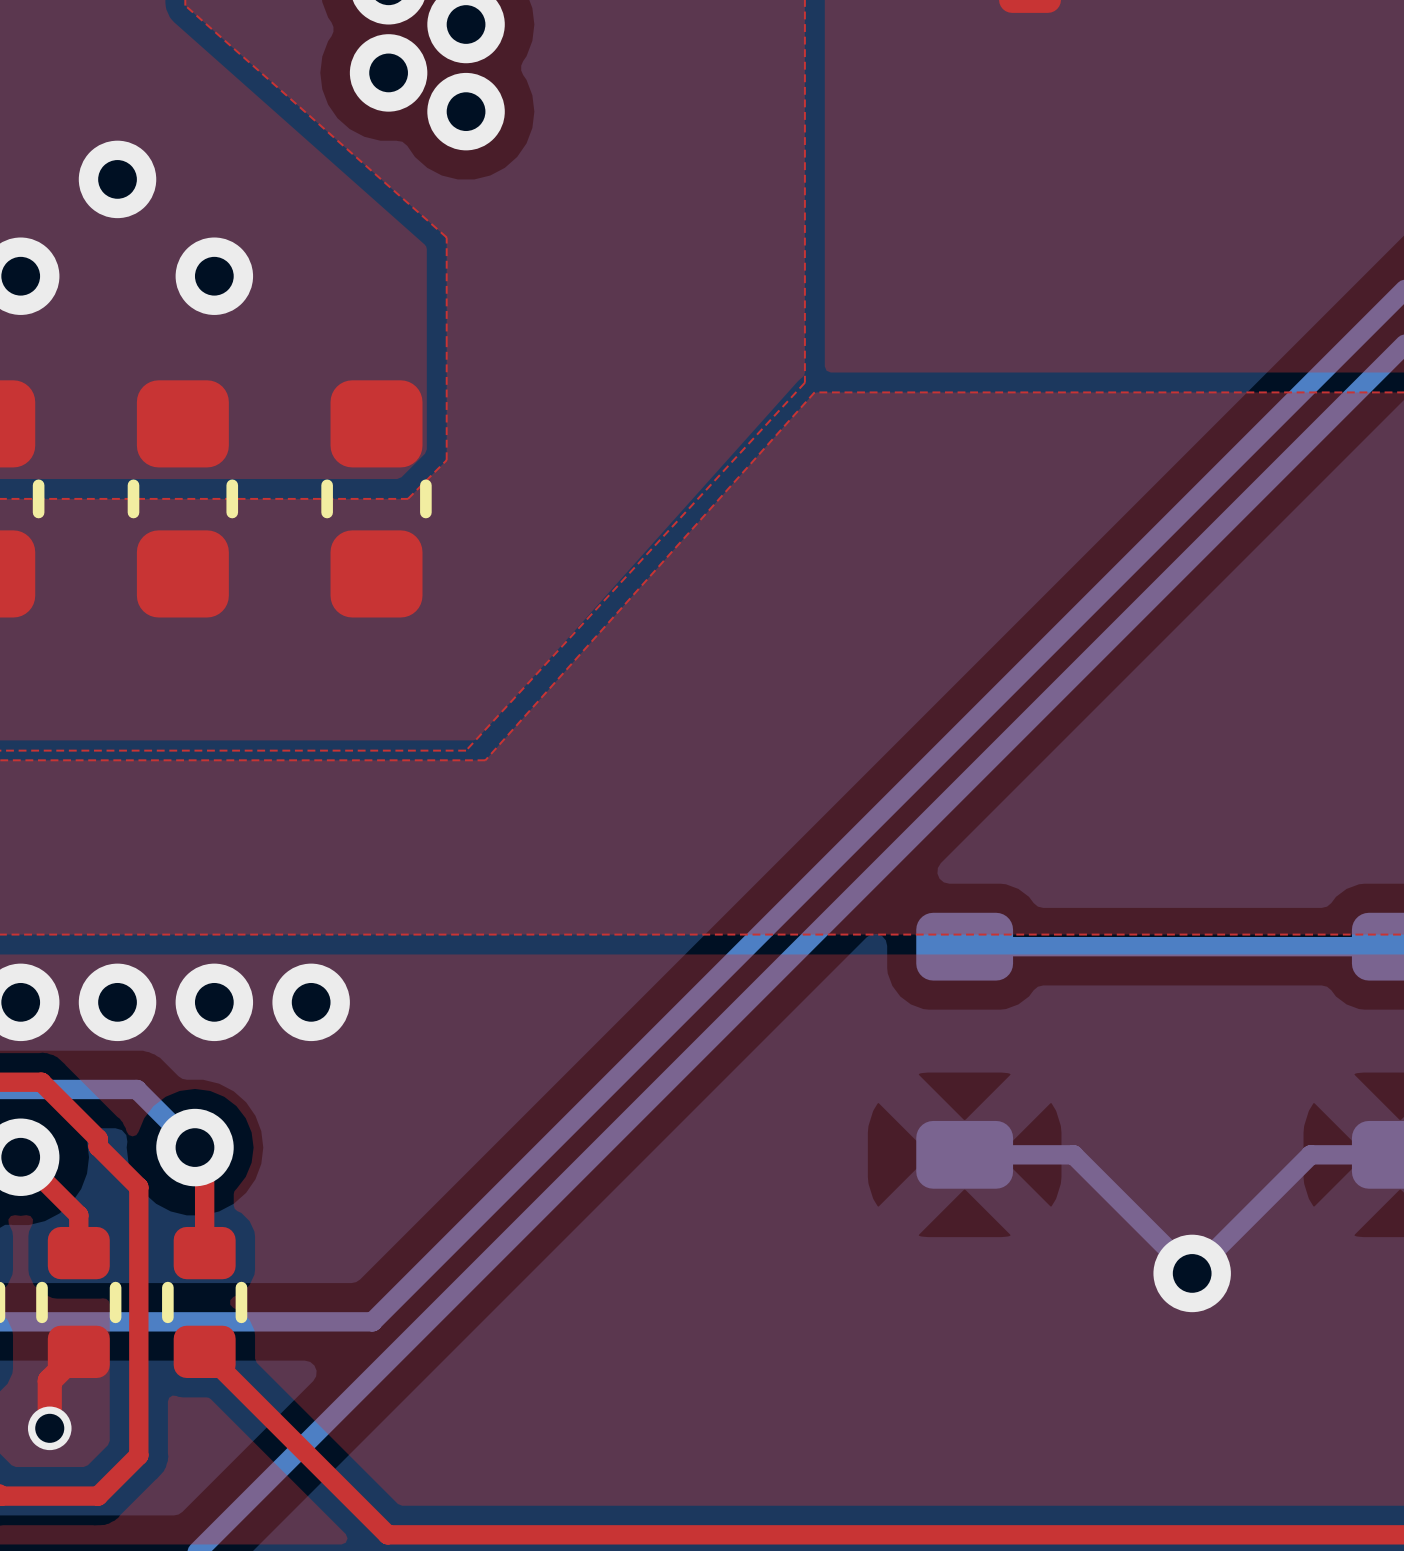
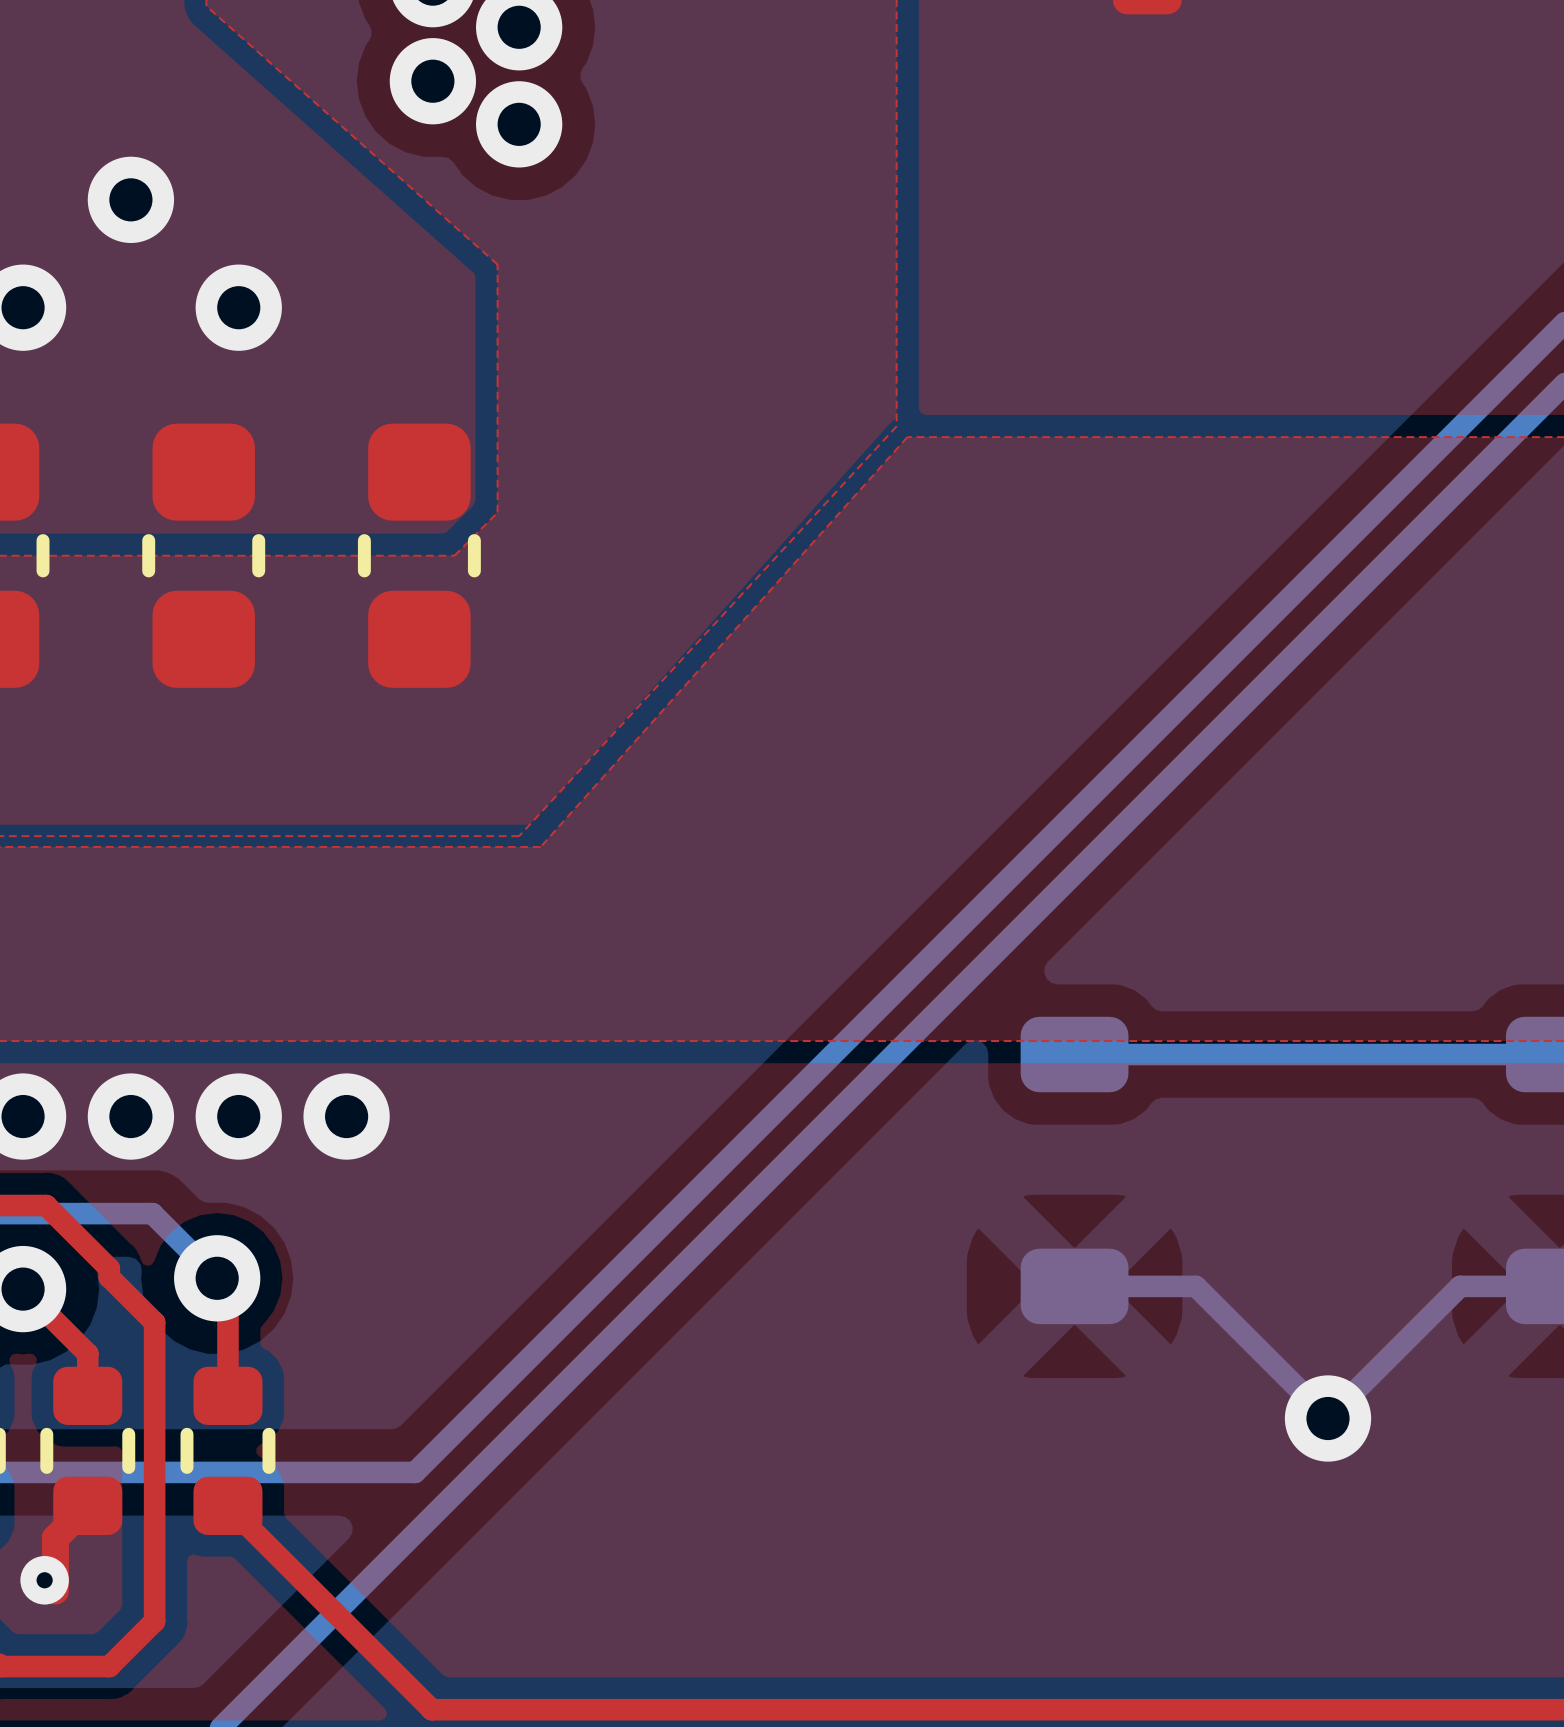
via position: (49, 1428) -> (44, 1580)

